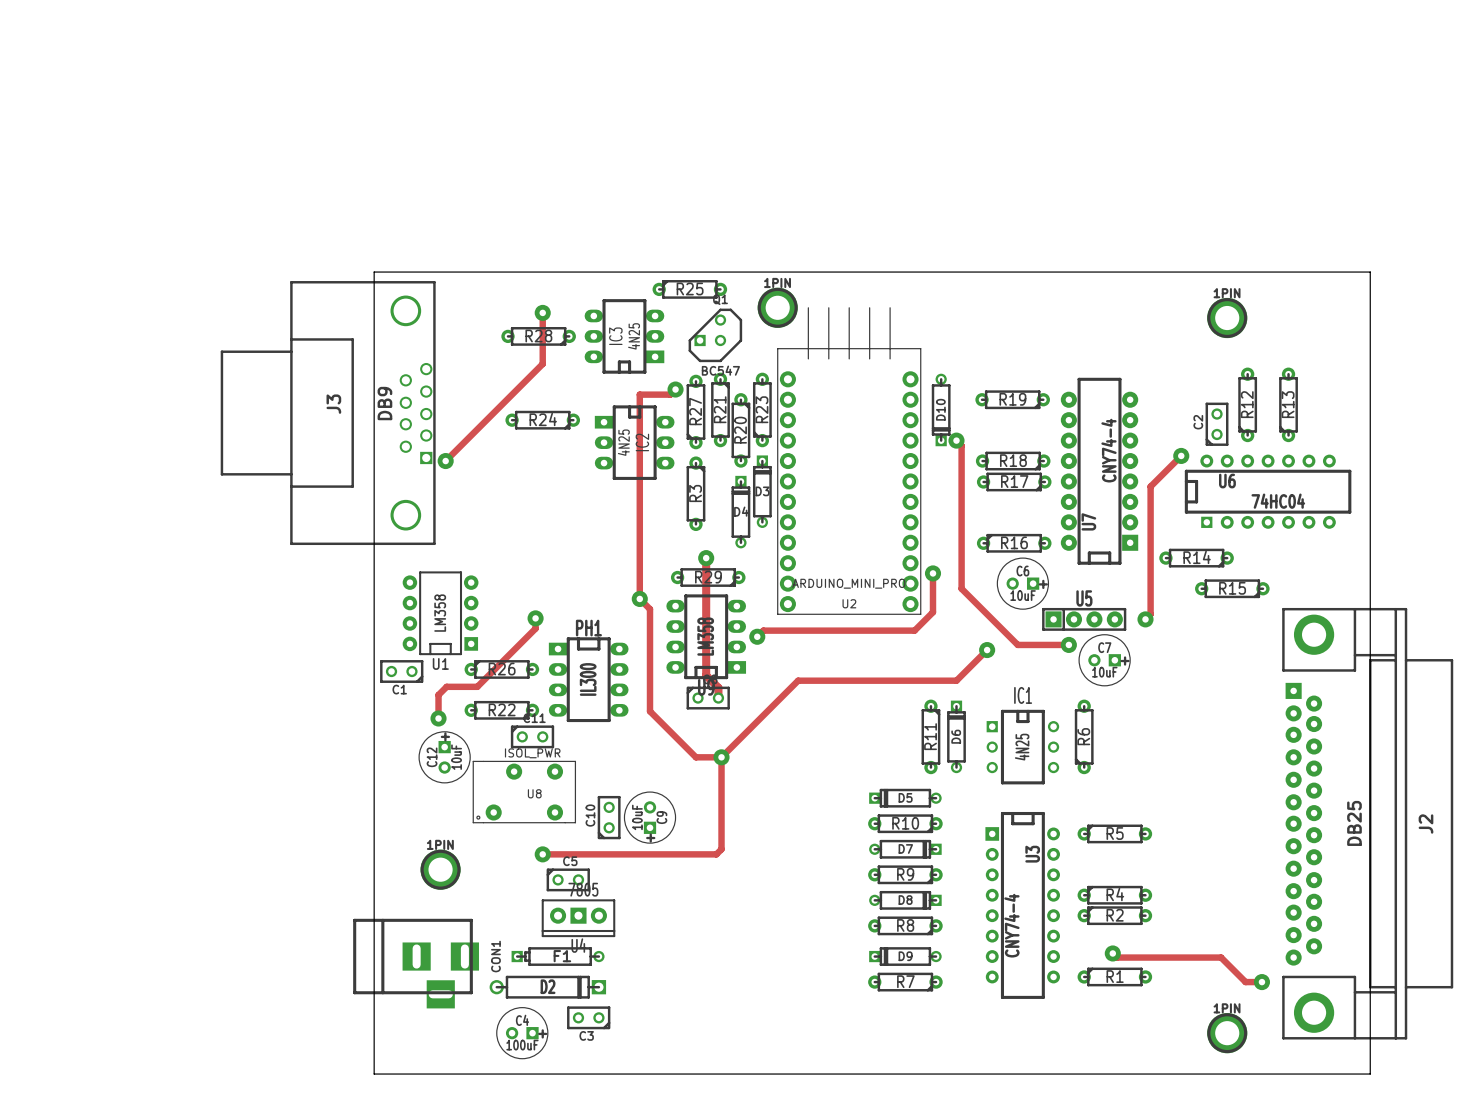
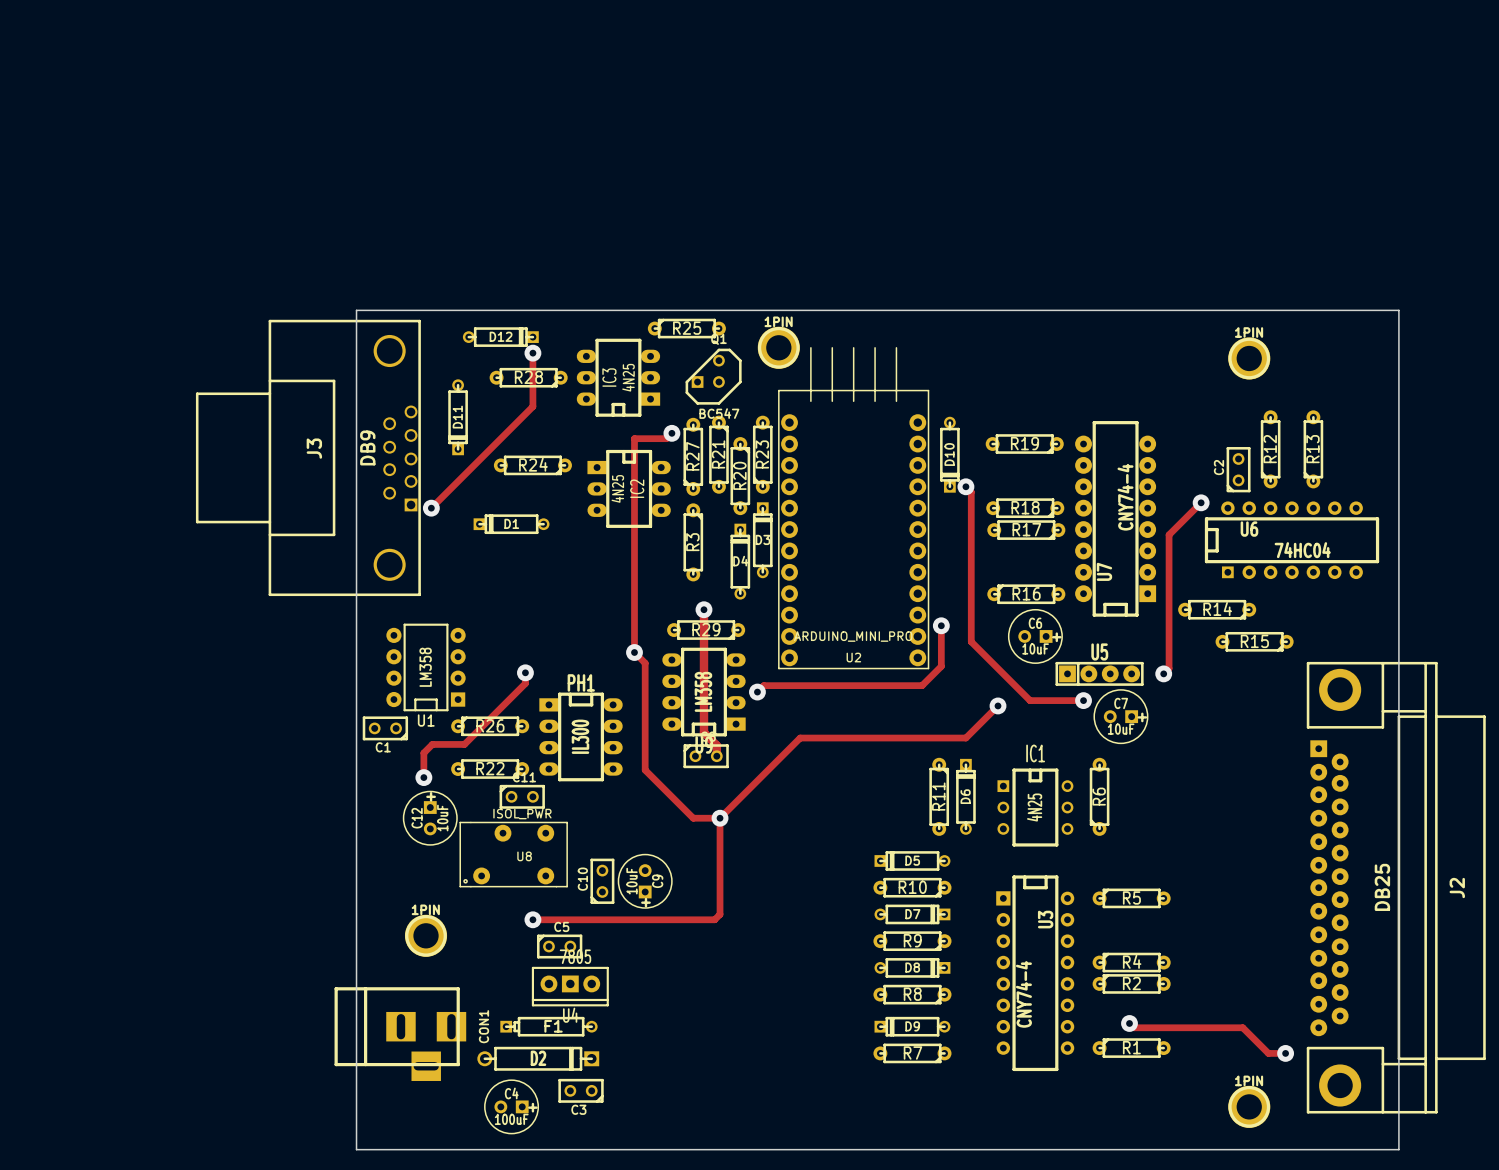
D12: none -> (500, 337)
D11: none -> (458, 417)
D1: none -> (511, 524)

